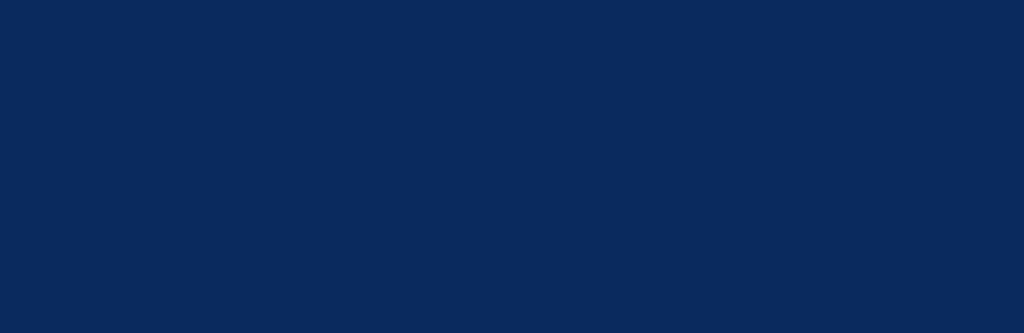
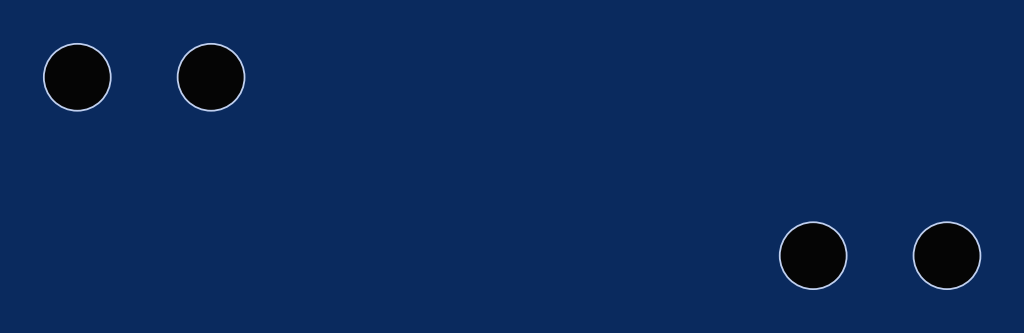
part: none -> (77, 77)
part: none -> (211, 77)
part: none -> (813, 255)
part: none -> (946, 255)

